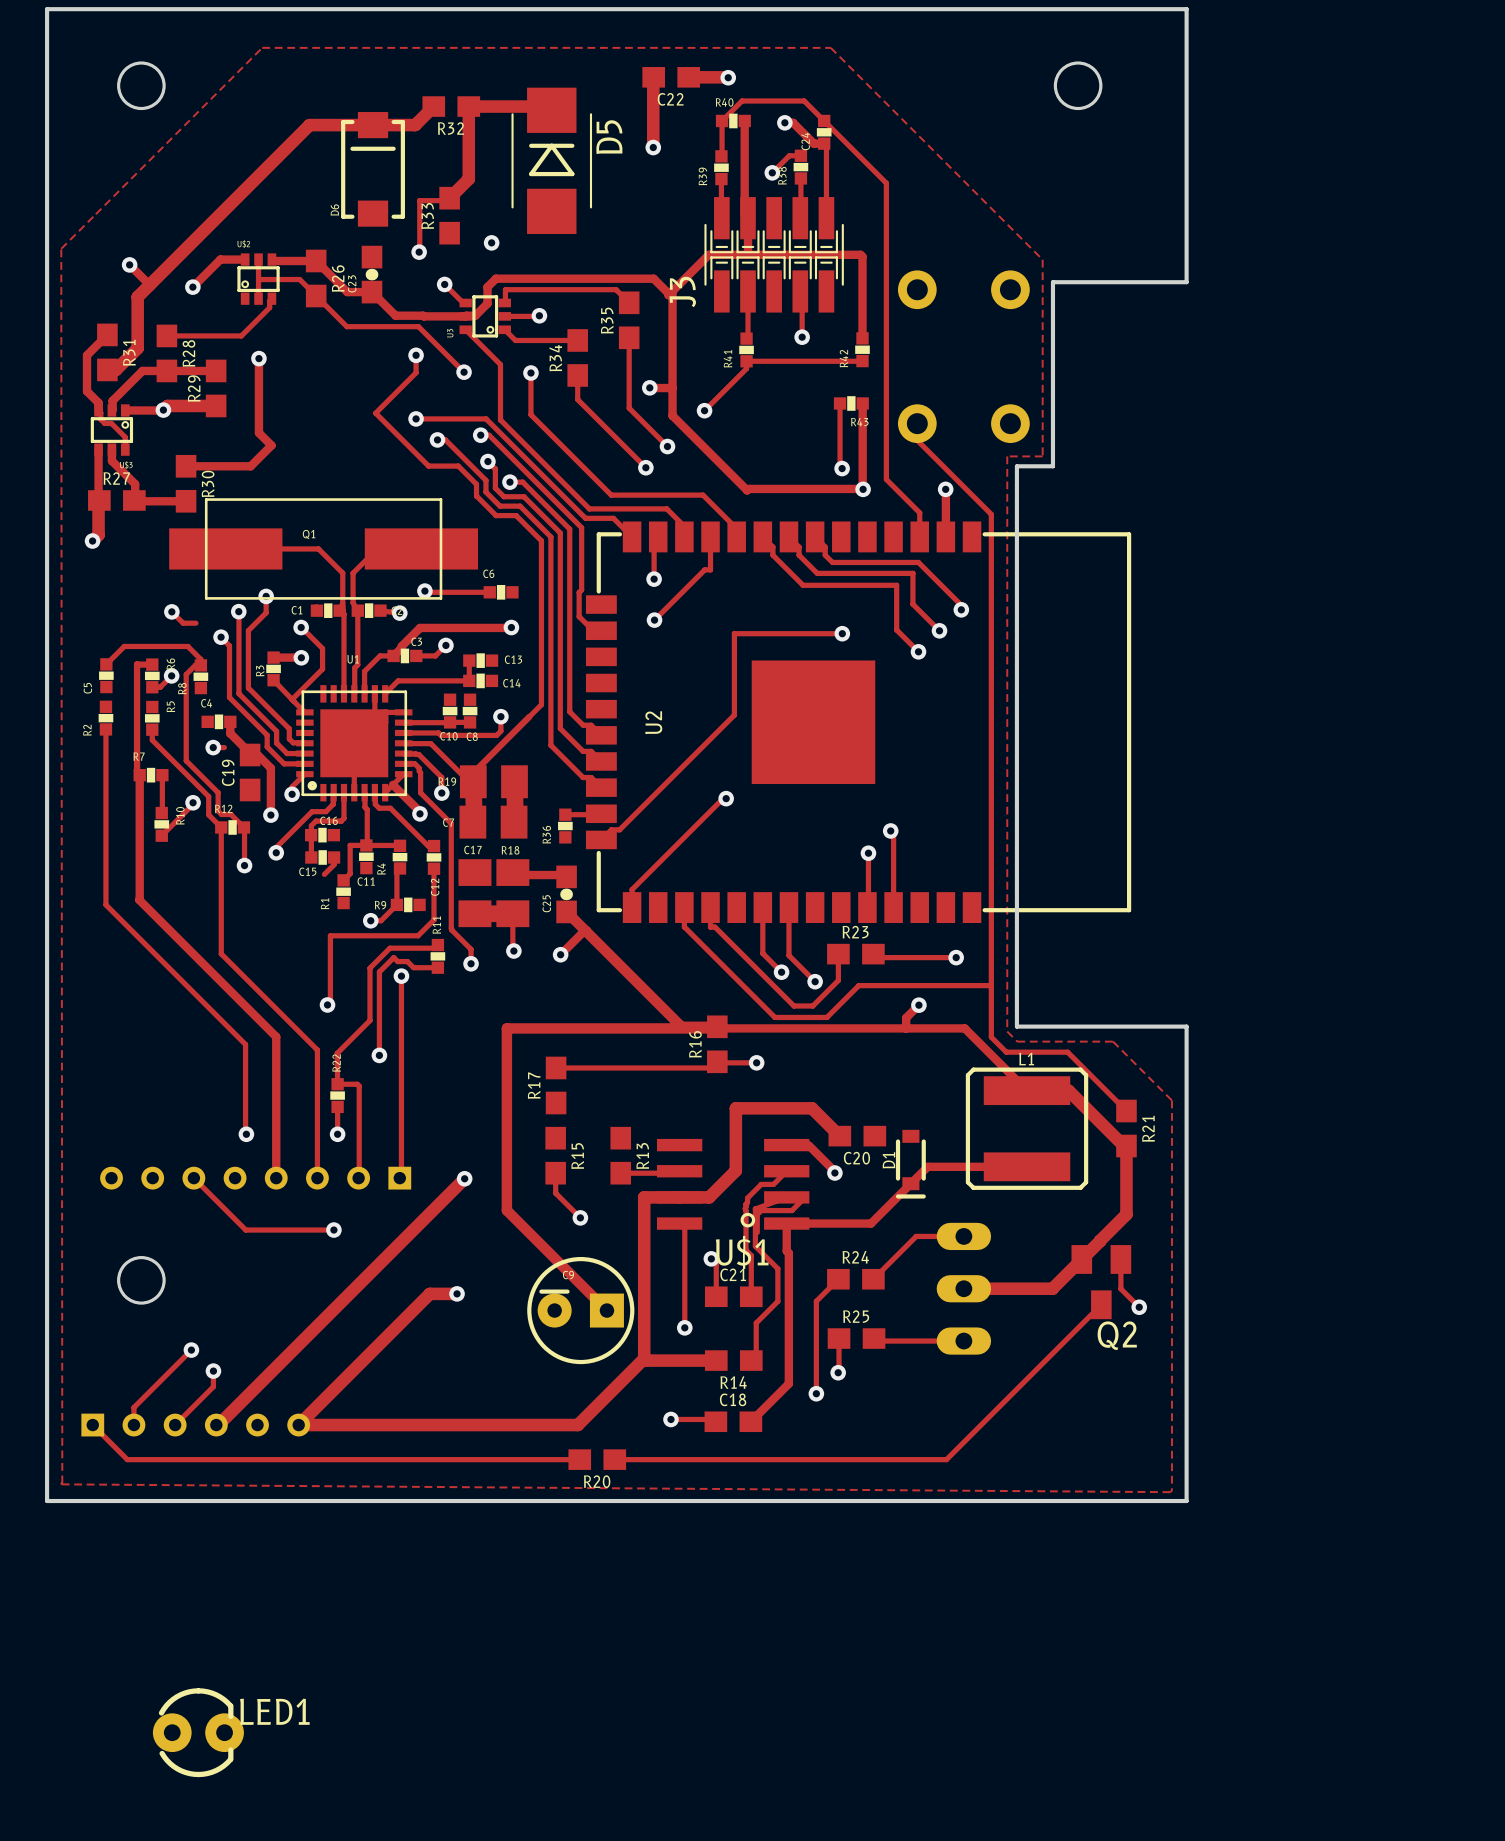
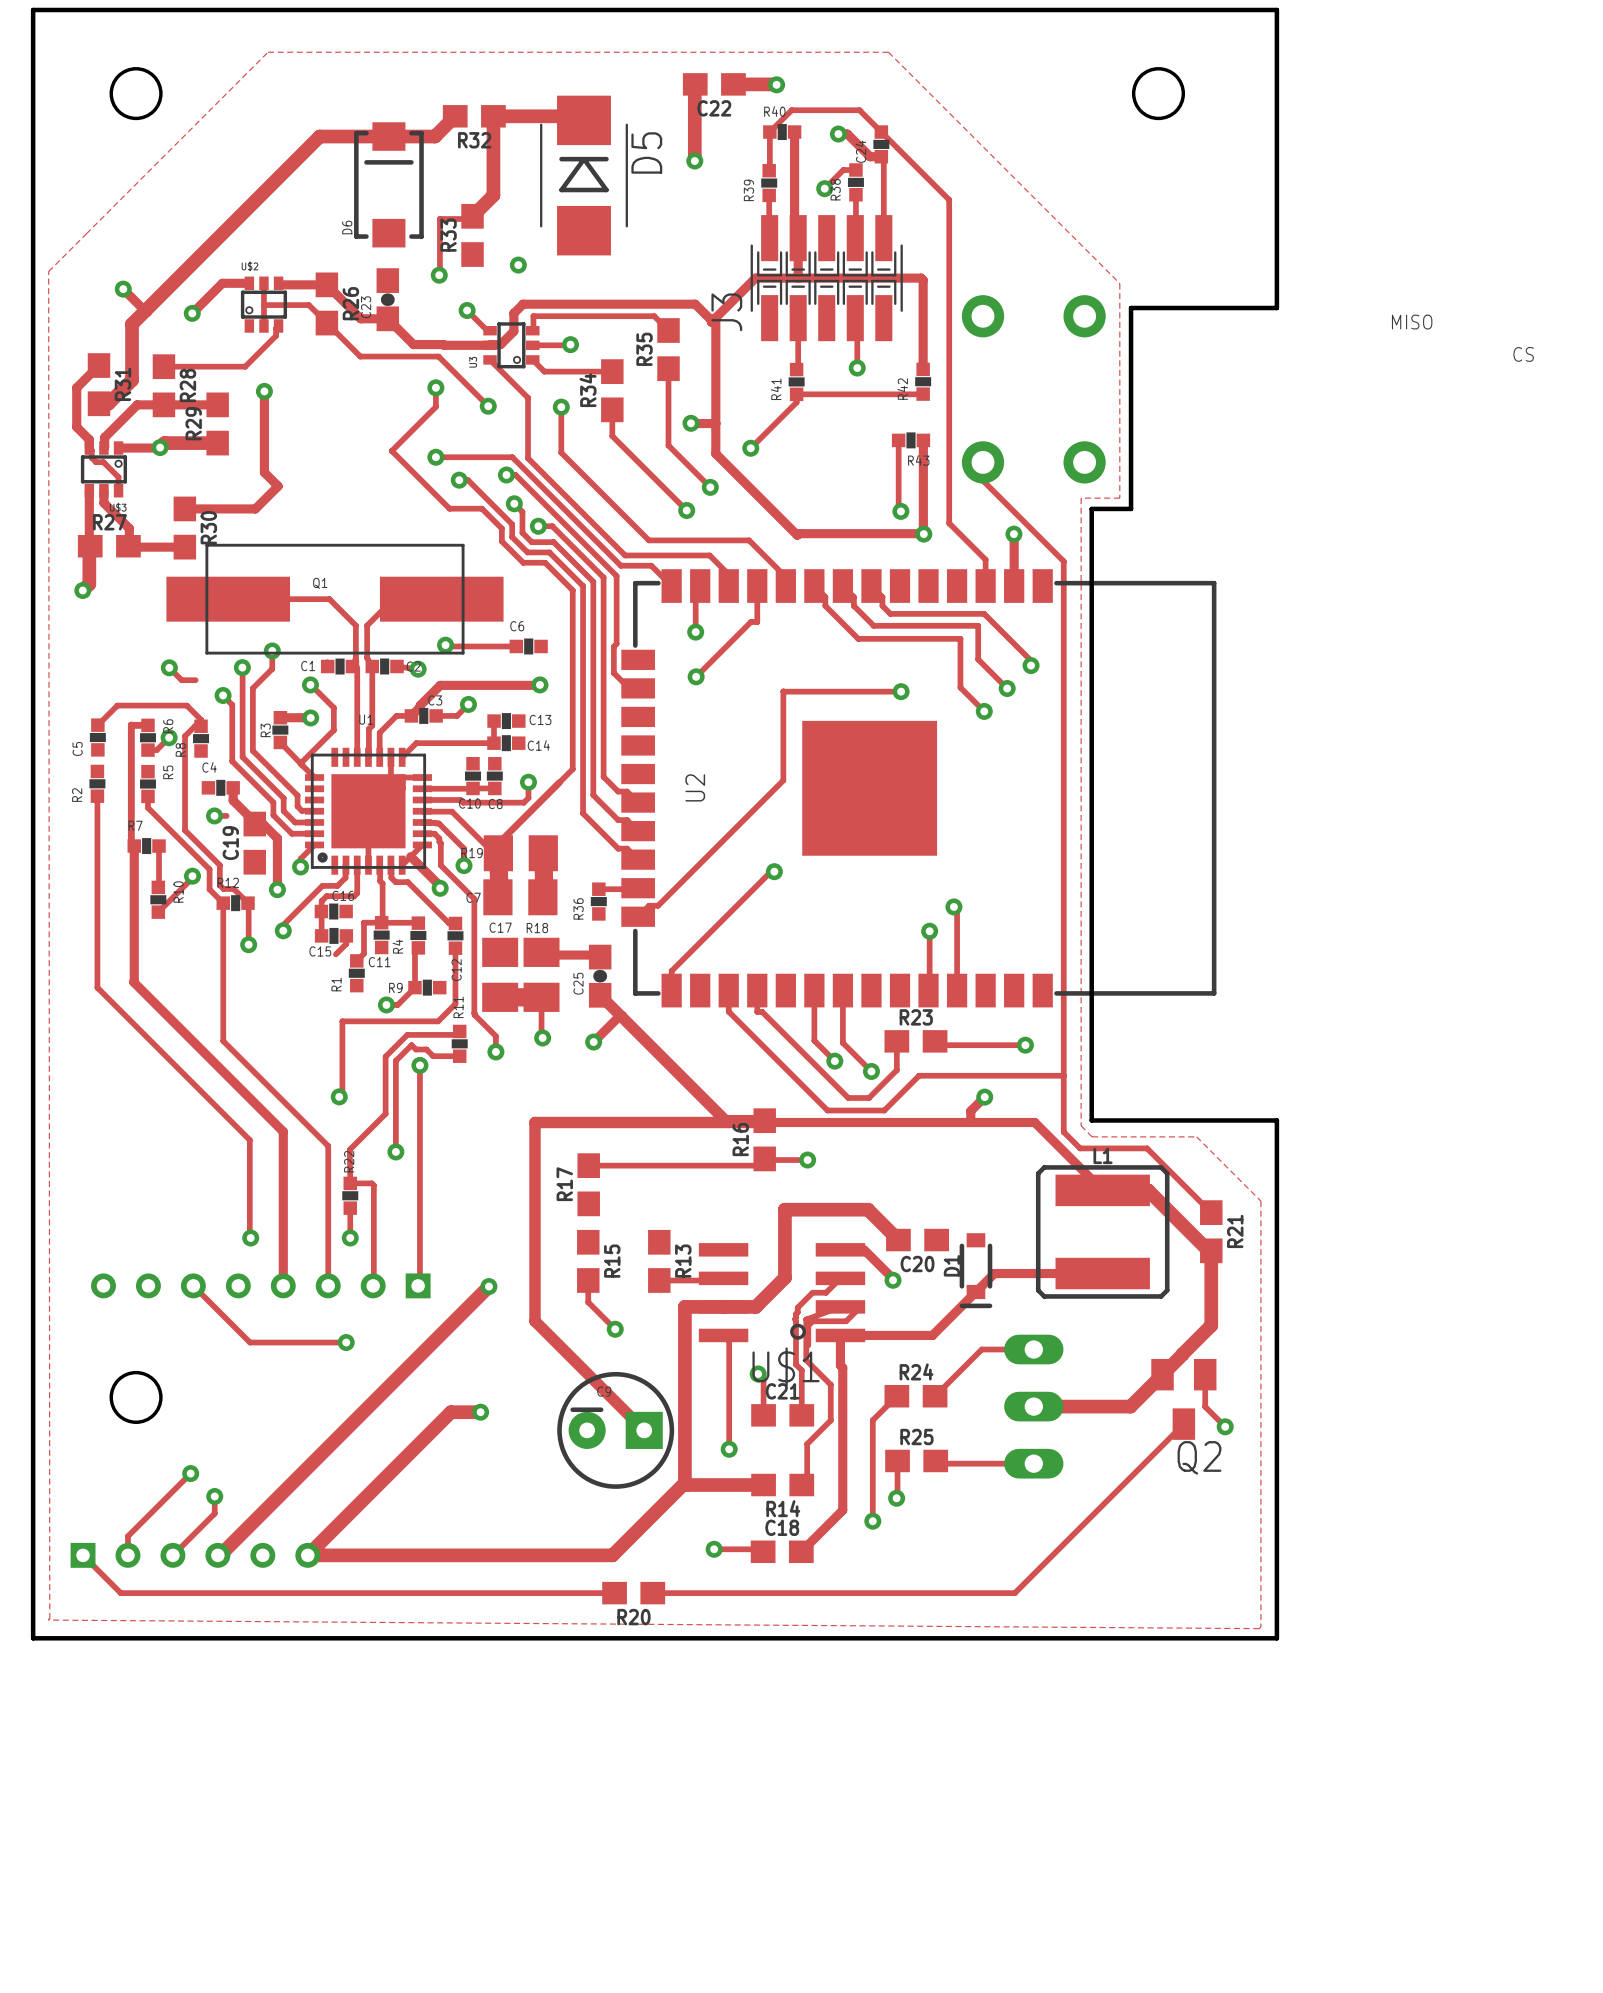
text: none -> MISO (1412, 322)
text: none -> CS (1523, 354)
LED1: (198, 1732) -> none

